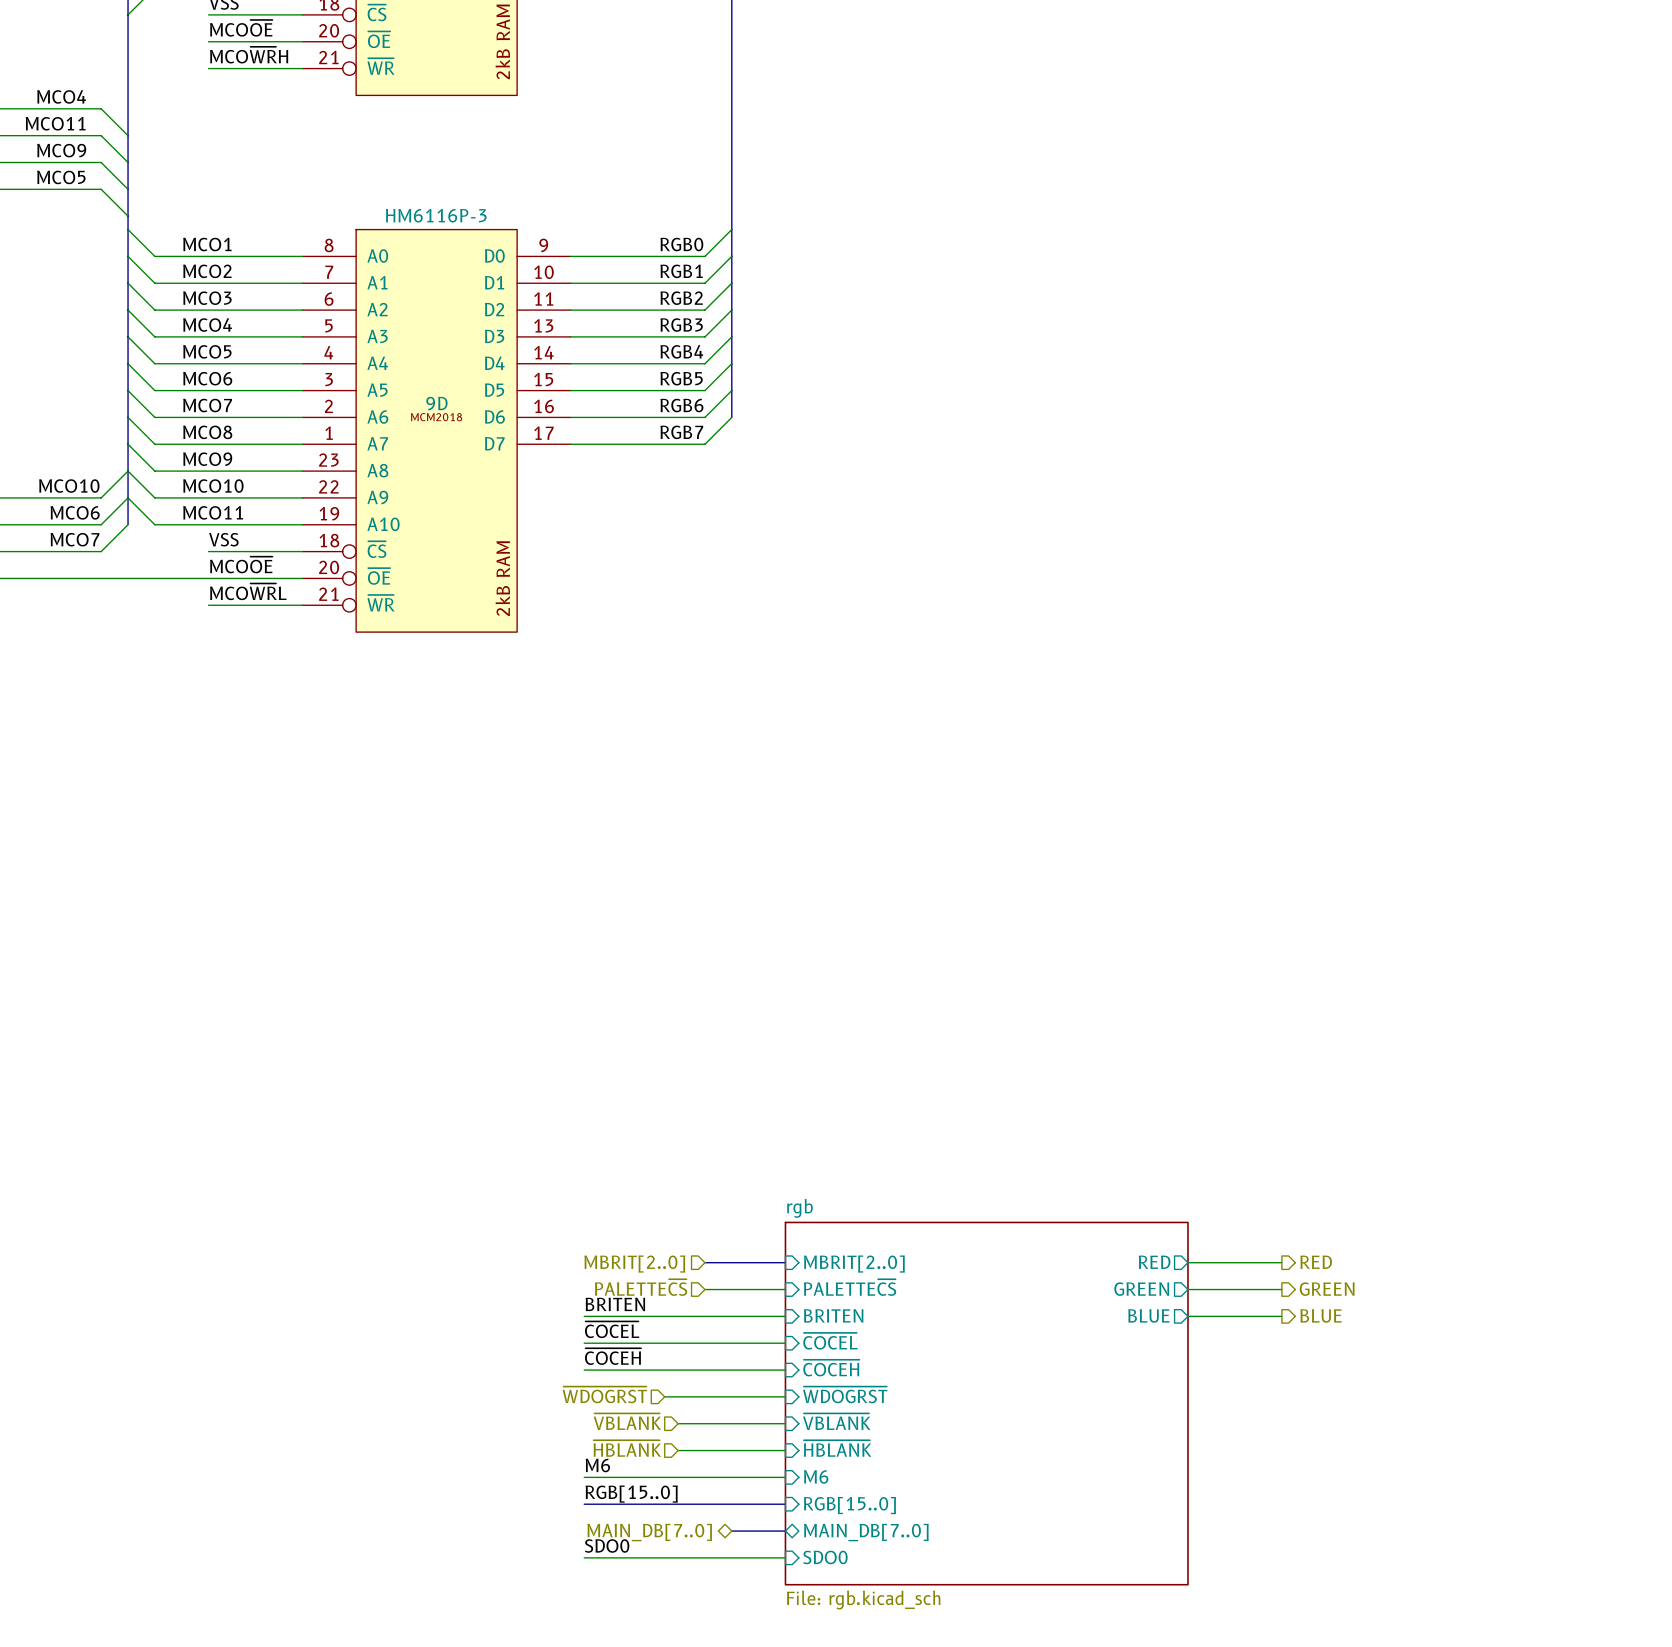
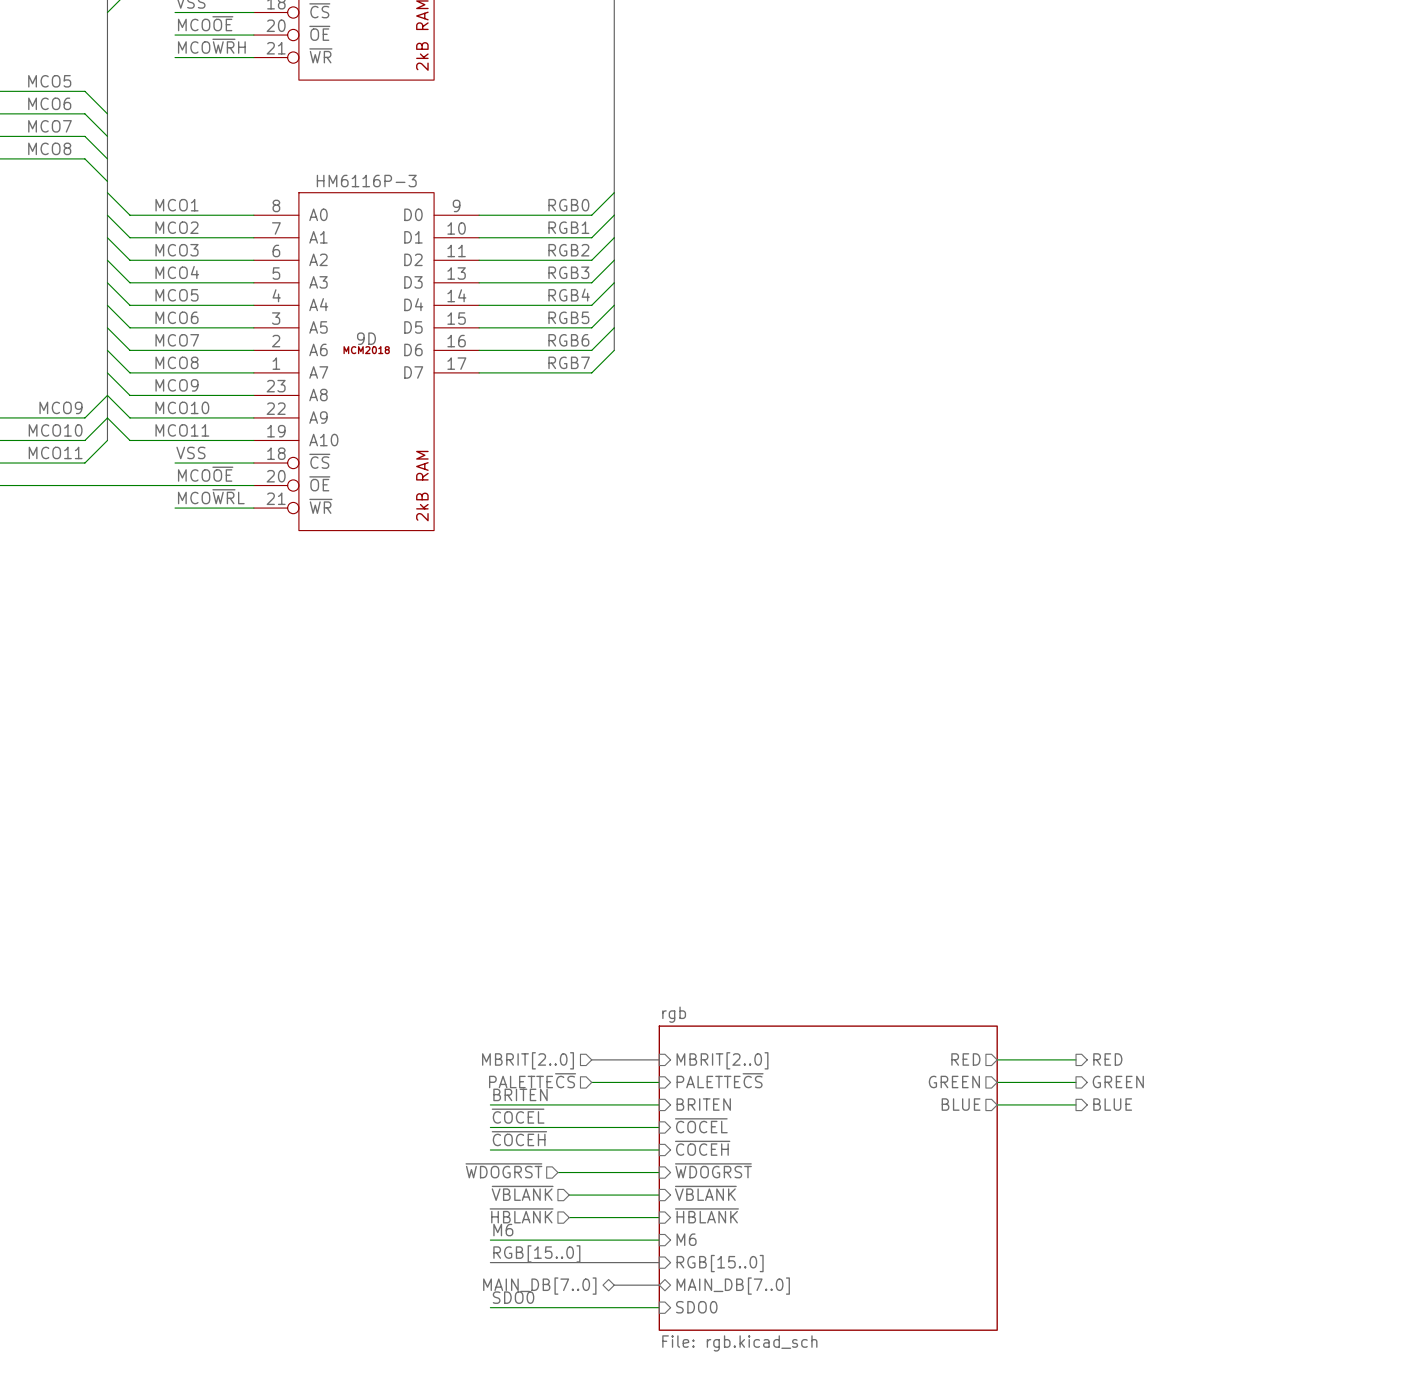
label: MCO4 (61, 96) -> MCO5 (49, 81)
label: MCO11 (55, 123) -> MCO6 (49, 103)
label: MCO9 (61, 150) -> MCO7 (49, 126)
label: MCO5 (61, 177) -> MCO8 (49, 148)
label: MCO10 (69, 486) -> MCO9 (60, 407)
label: MCO6 (75, 512) -> MCO10 (55, 430)
label: MCO7 (75, 539) -> MCO11 (55, 452)

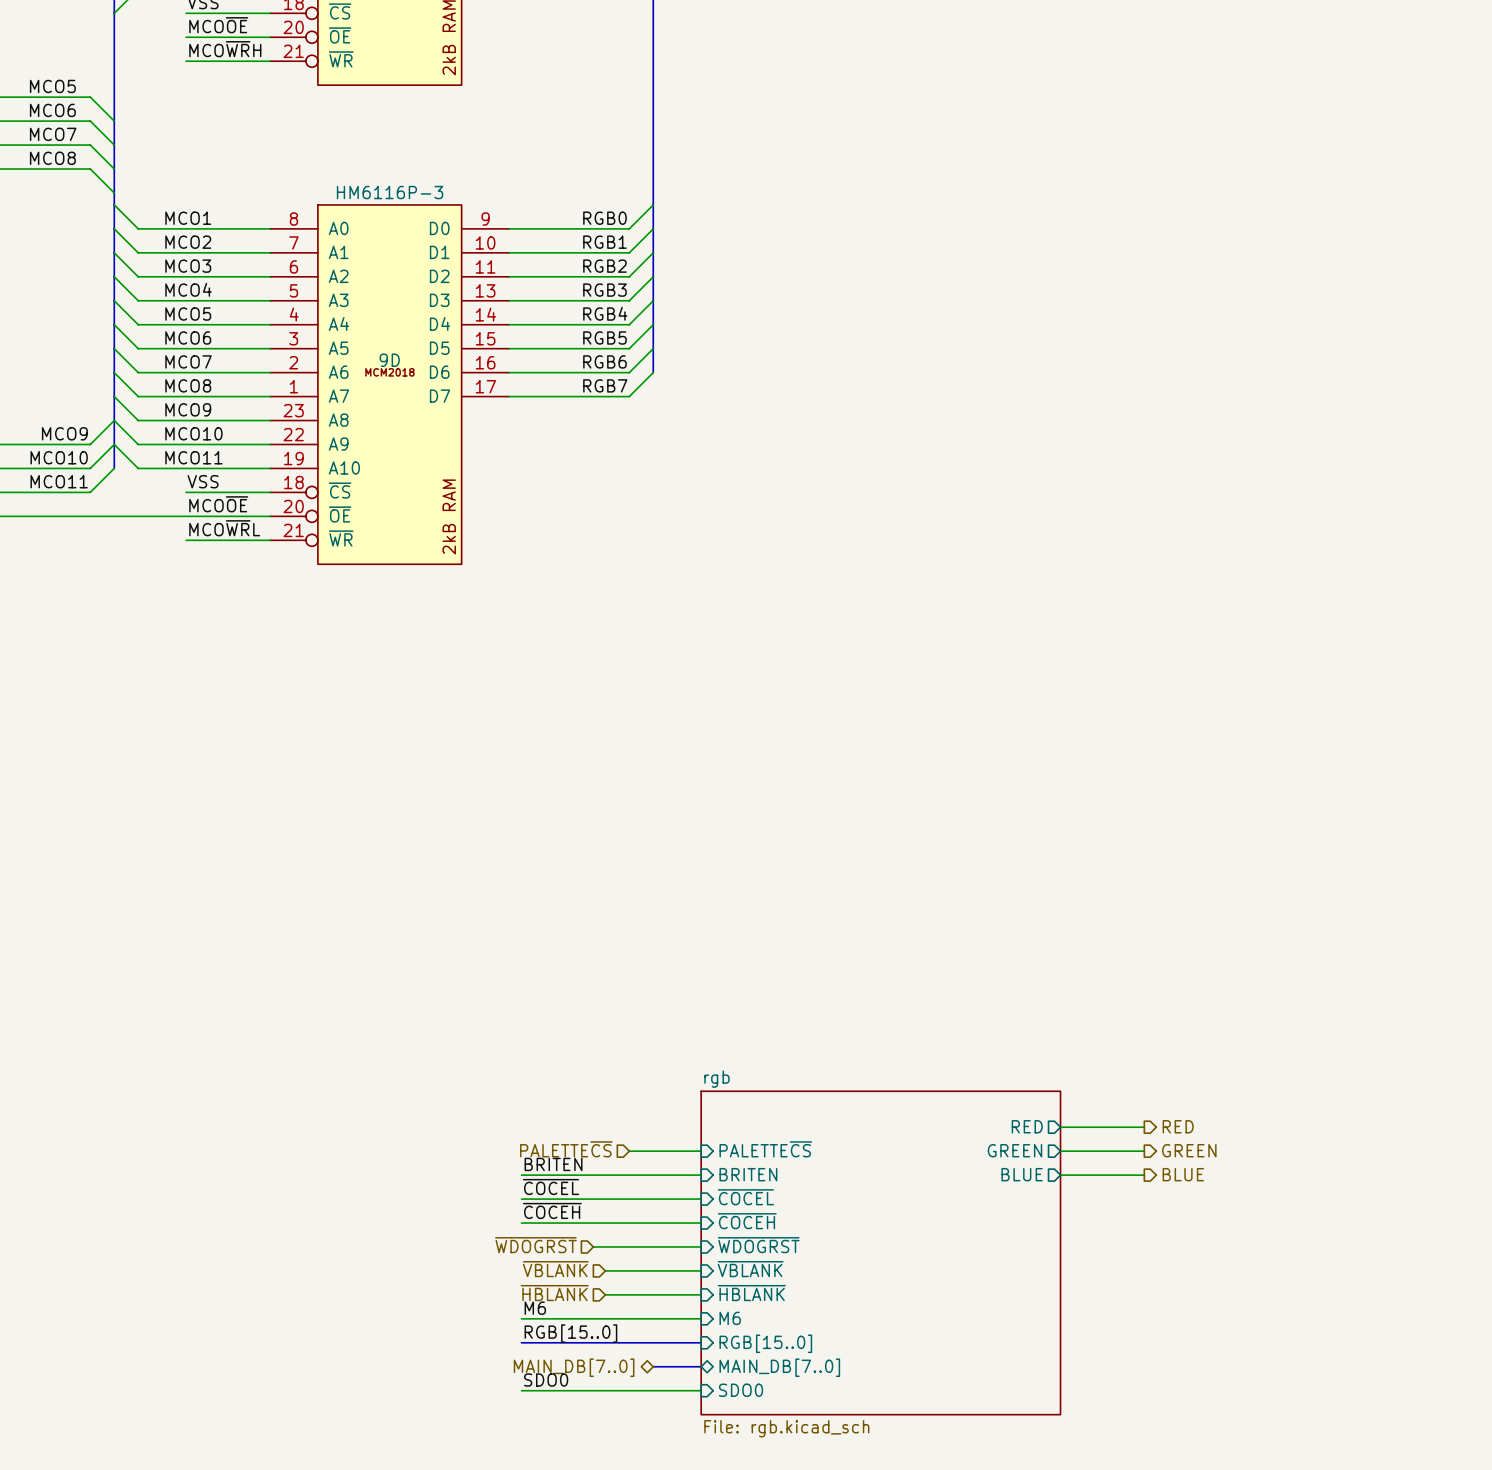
bus: (591, 1059) (659, 1059) -> none
hierarchical label: MBRIT[2..0] (528, 1060) -> none
sheet pin: MBRIT[2..0] (722, 1060) -> none

